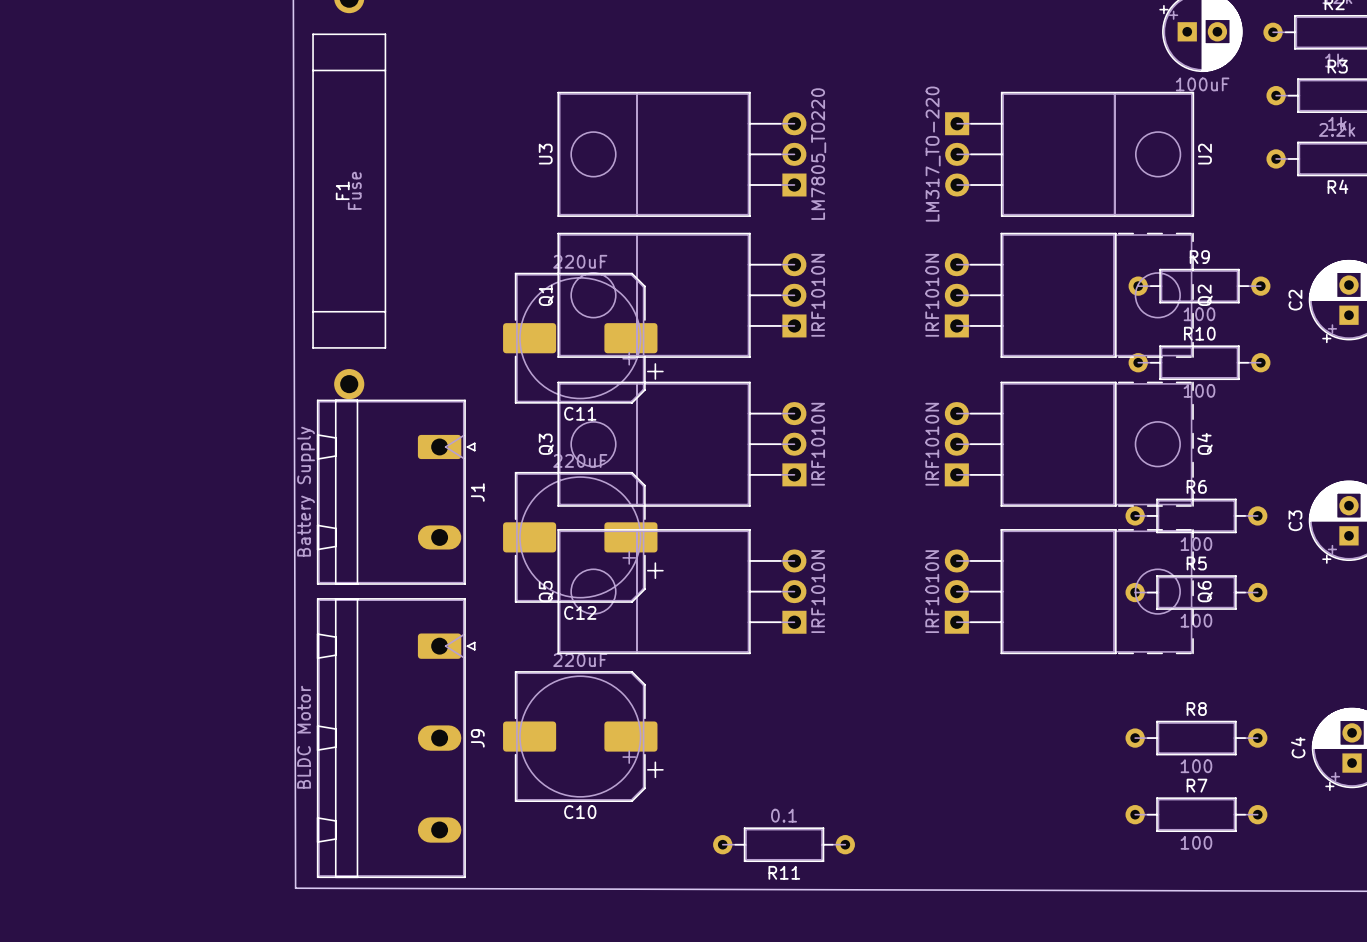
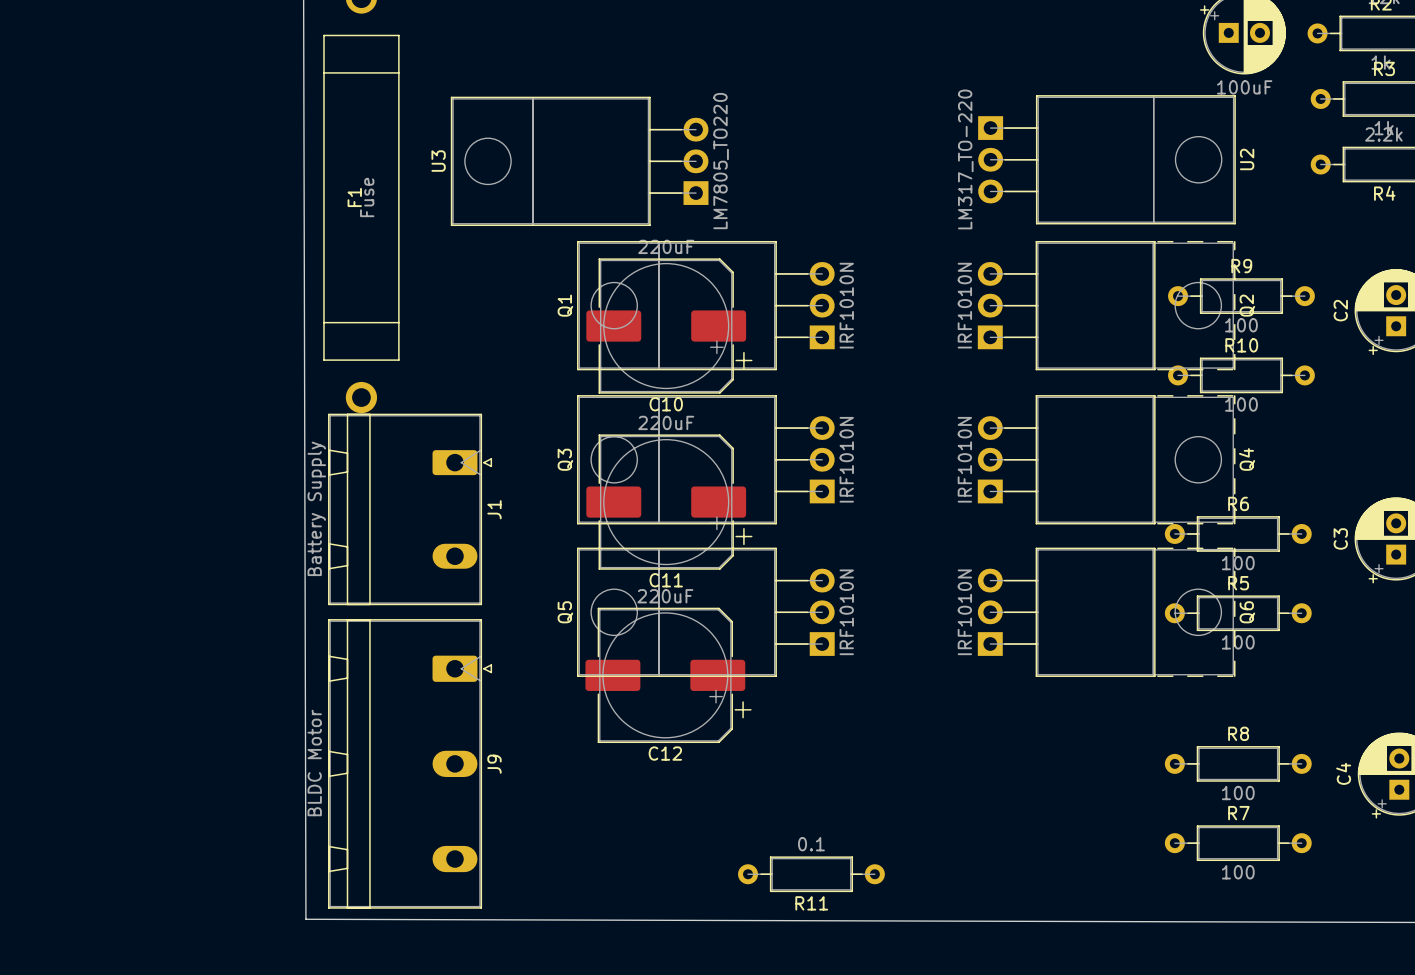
U3 position: (682, 154) -> (579, 161)
C11 position: (583, 338) -> (669, 502)
C12 position: (583, 537) -> (668, 675)
C10 position: (583, 736) -> (669, 326)

